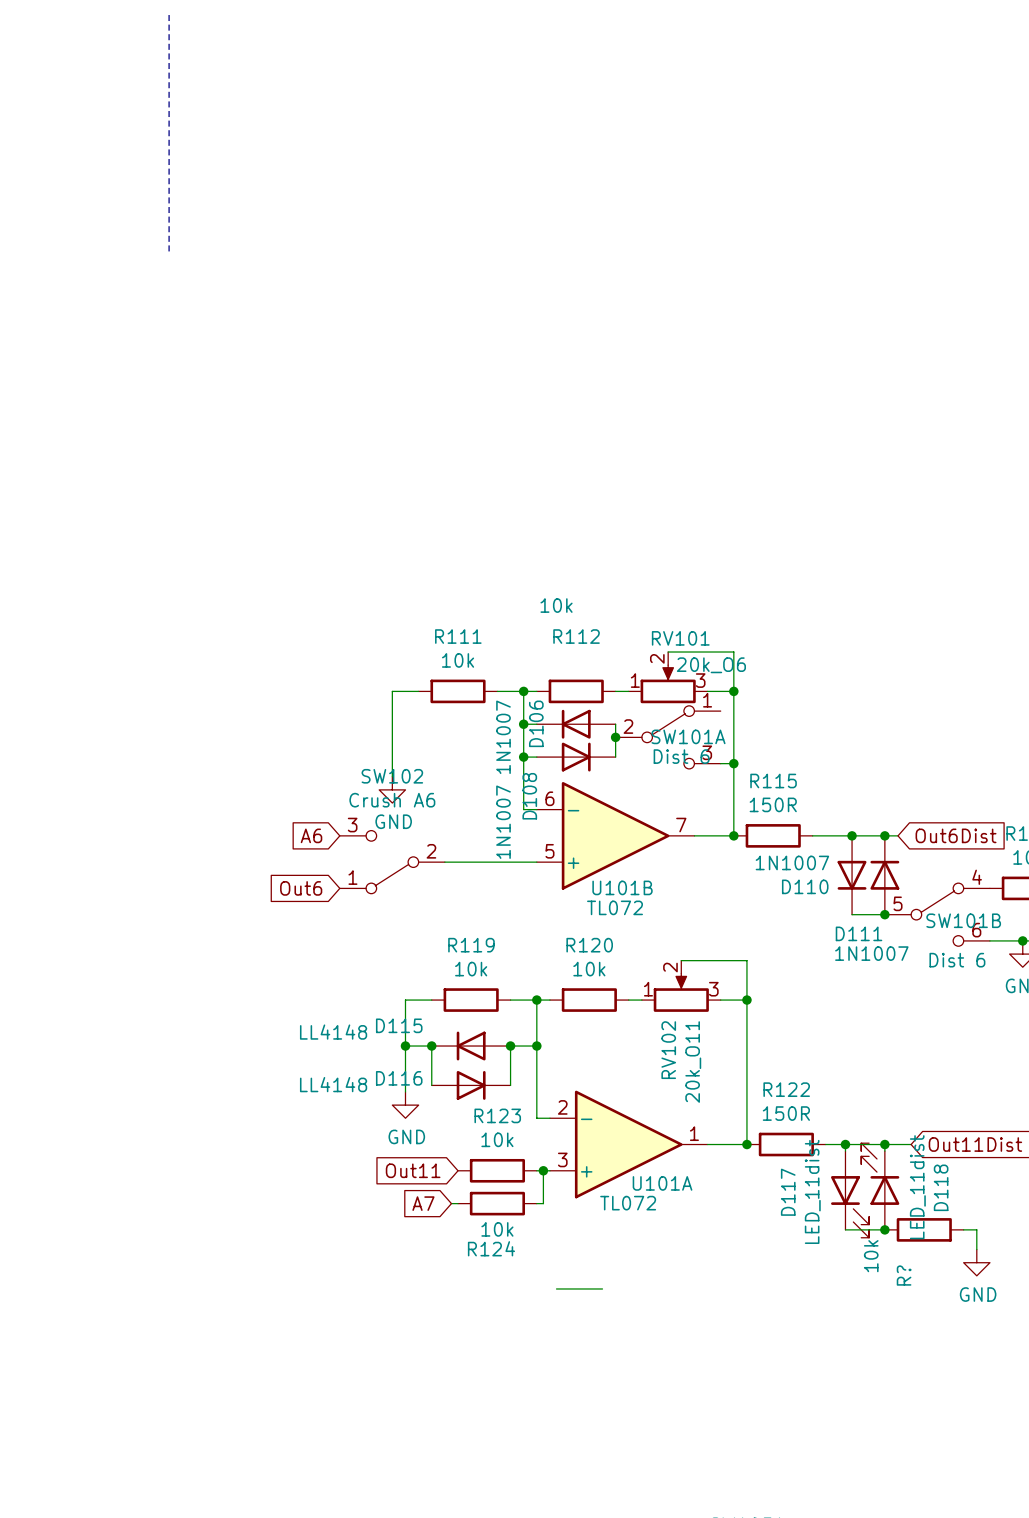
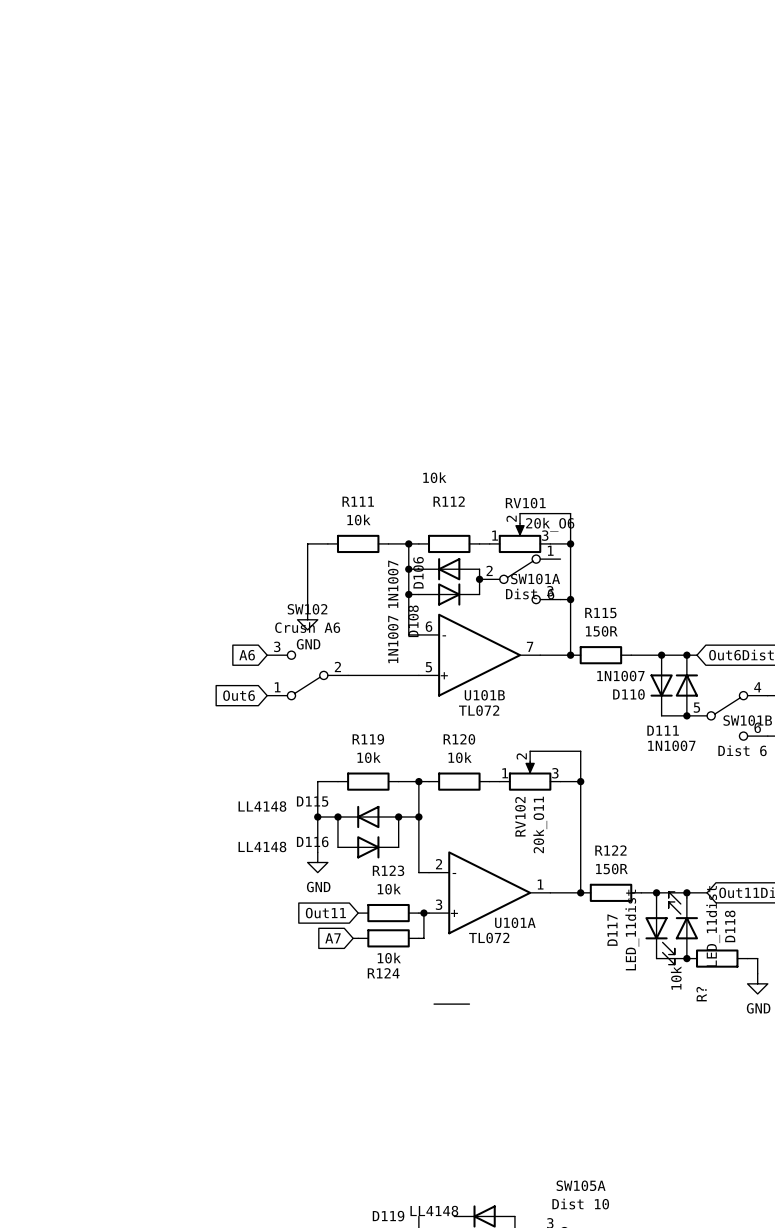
line: (169, 15) (169, 251) -> none

